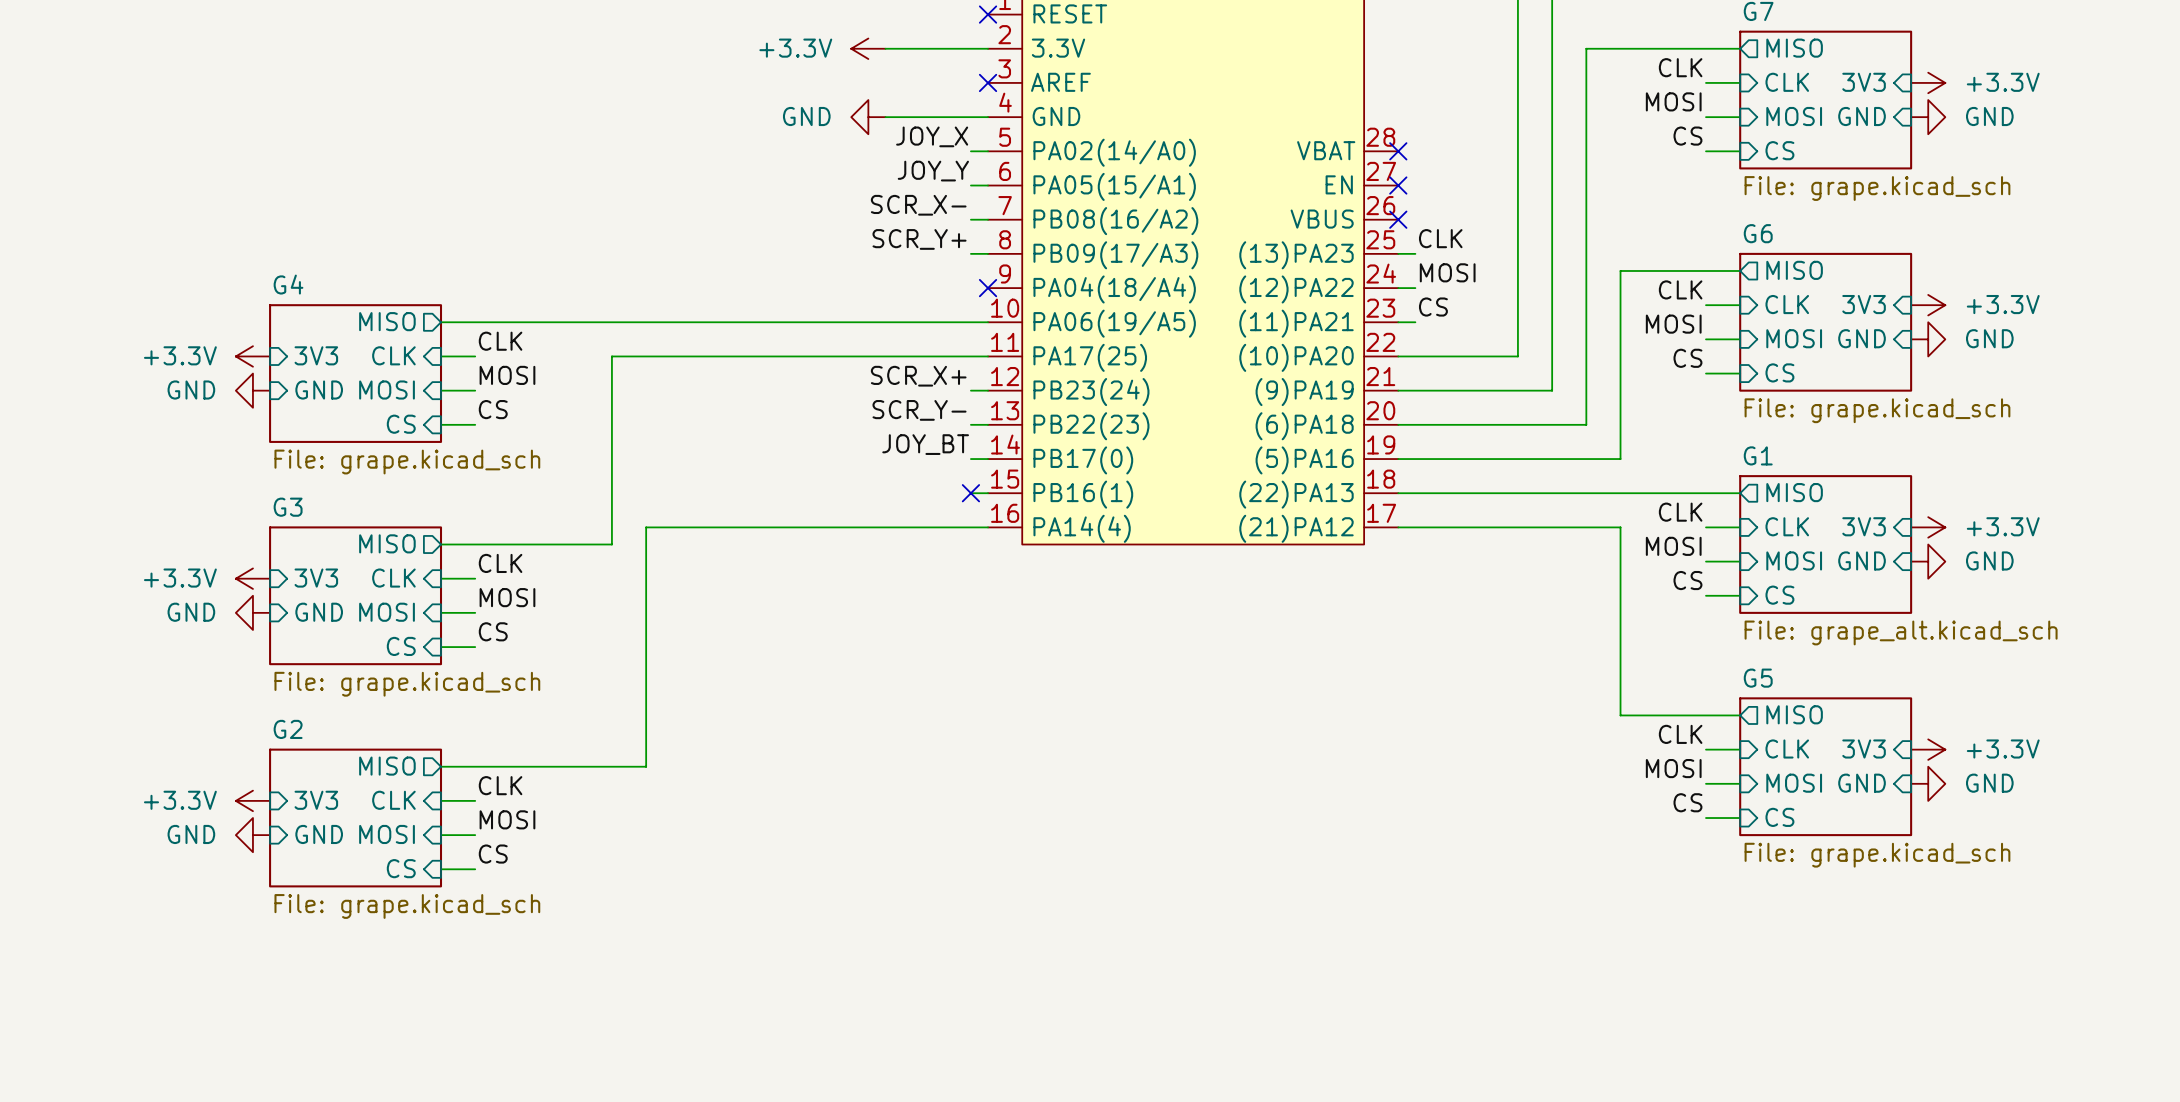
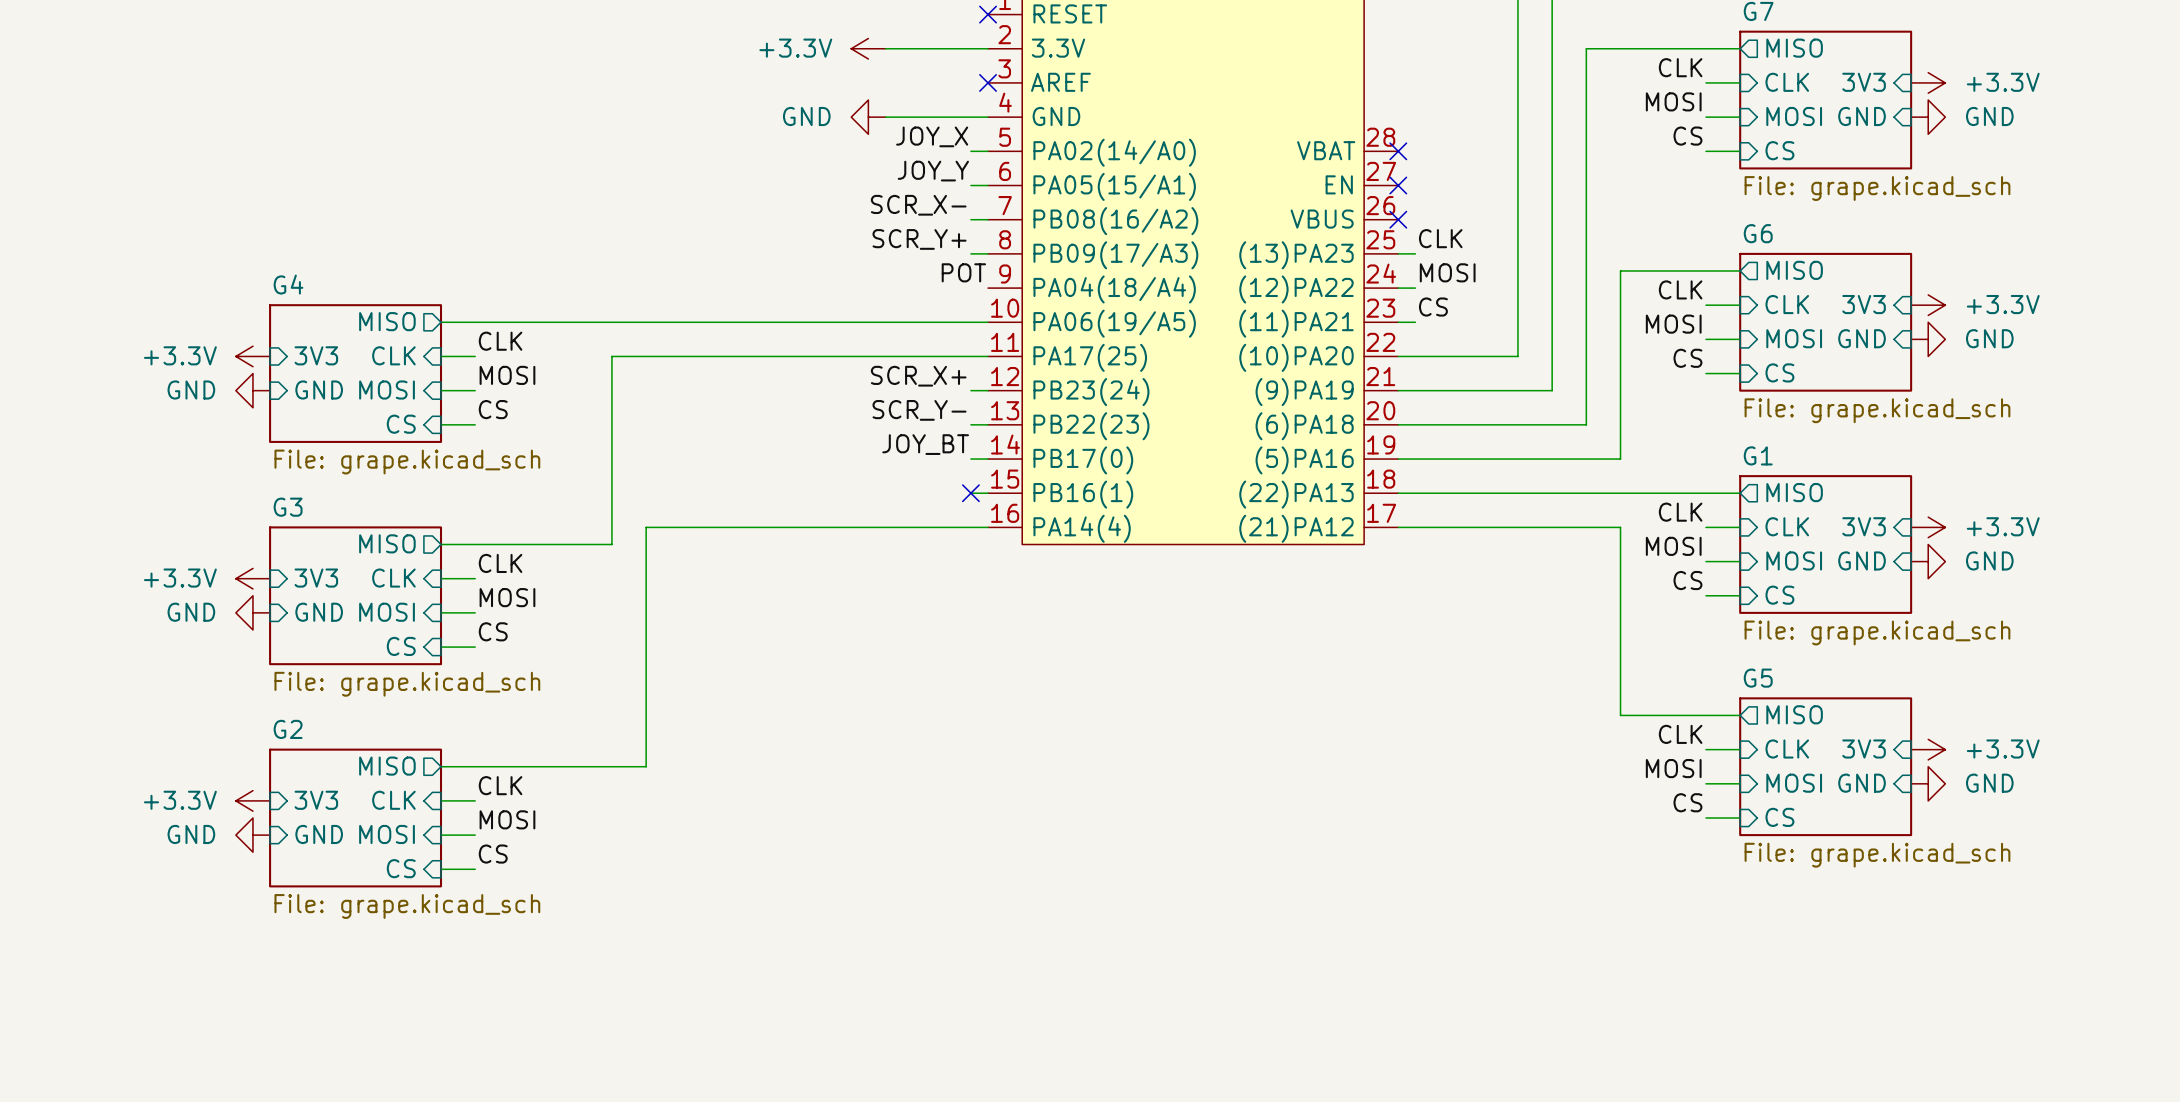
label: none -> POT (963, 272)
no-connect mark: (988, 288) -> none
sheet G1 value: File: grape_alt.kicad_sch (1901, 632) -> File: grape.kicad_sch (1877, 632)

